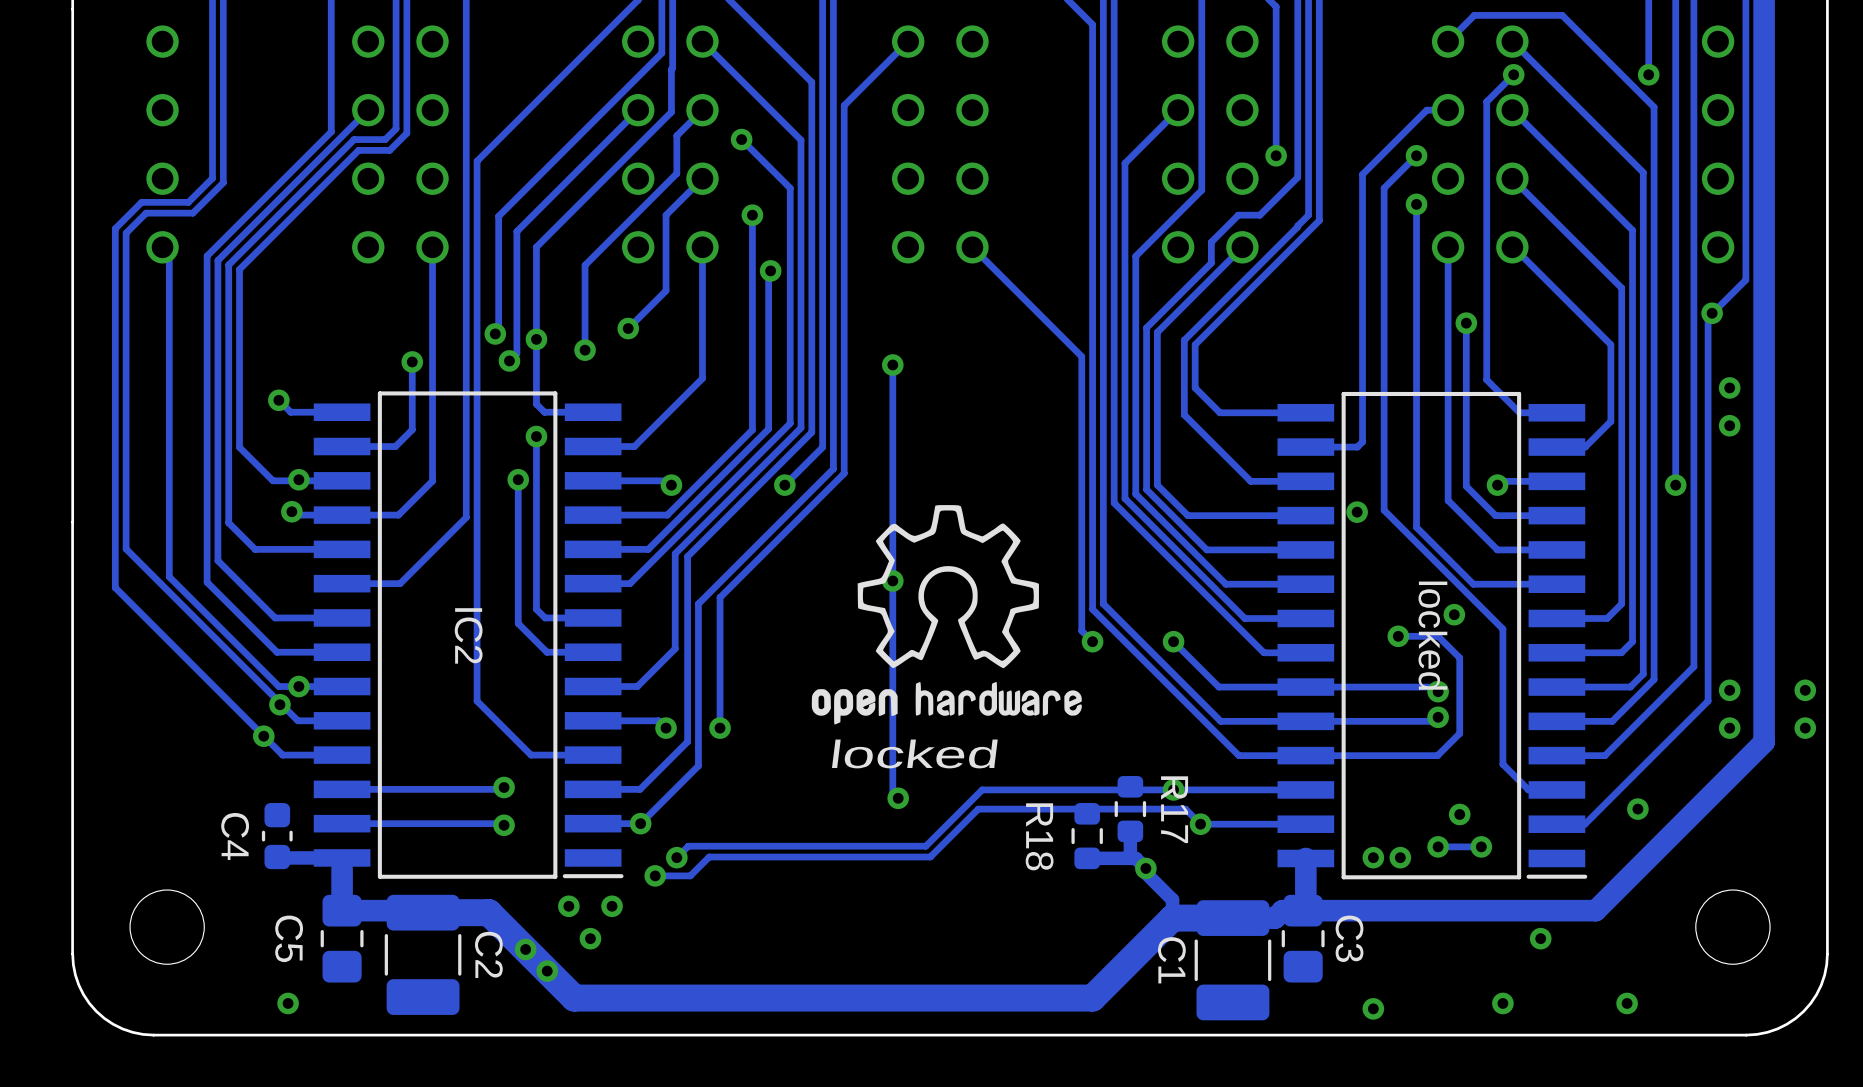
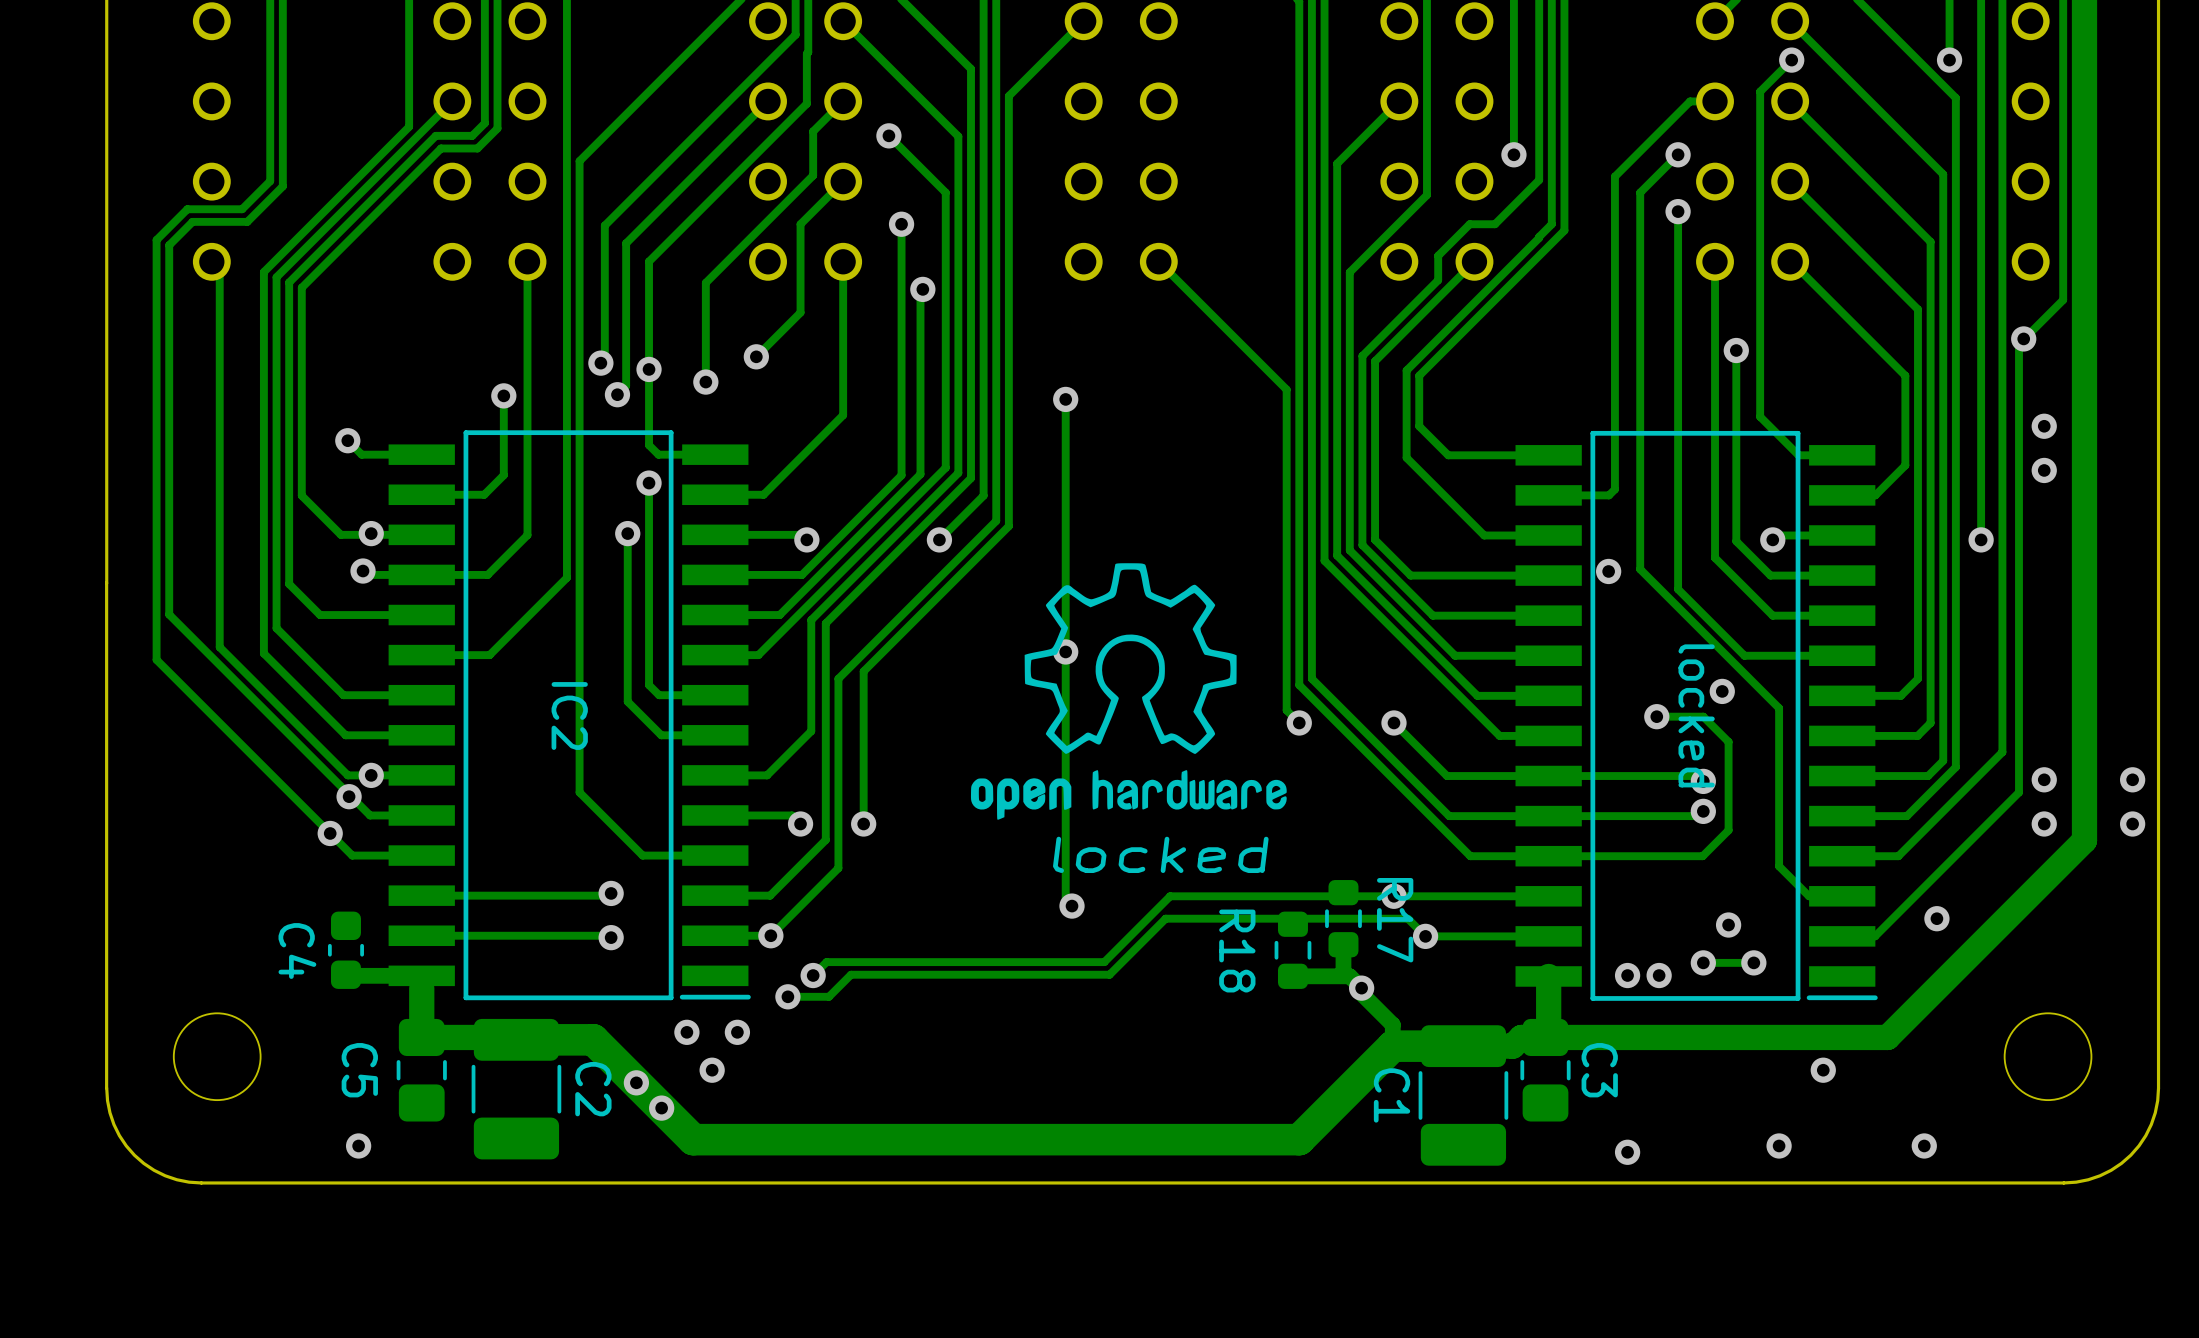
text position: locked (914, 753) -> locked (1160, 854)

